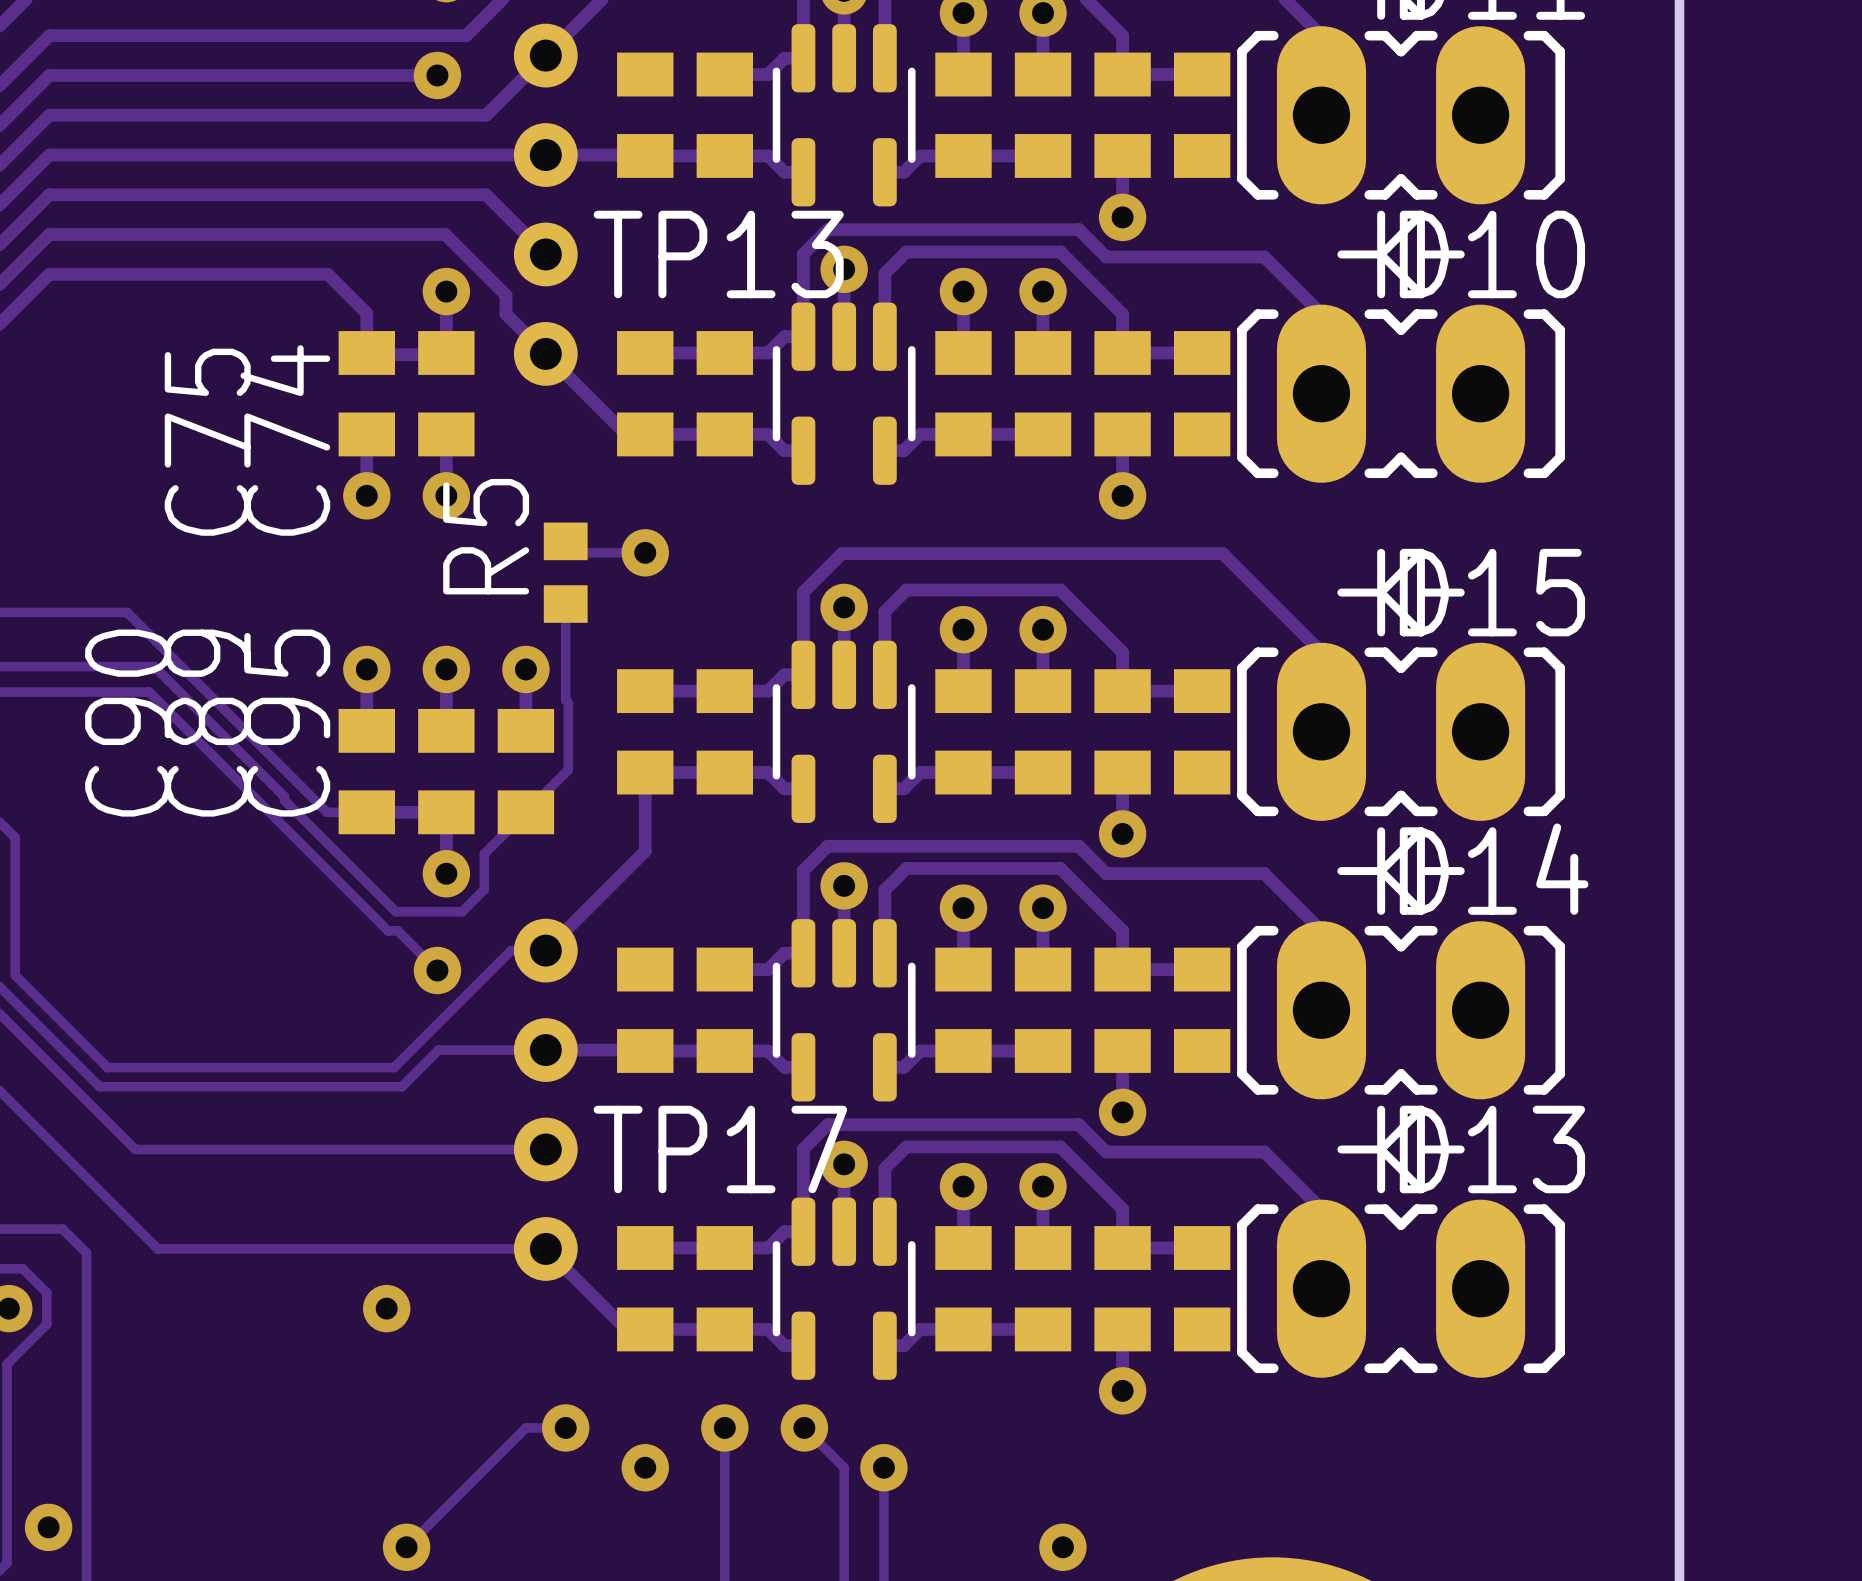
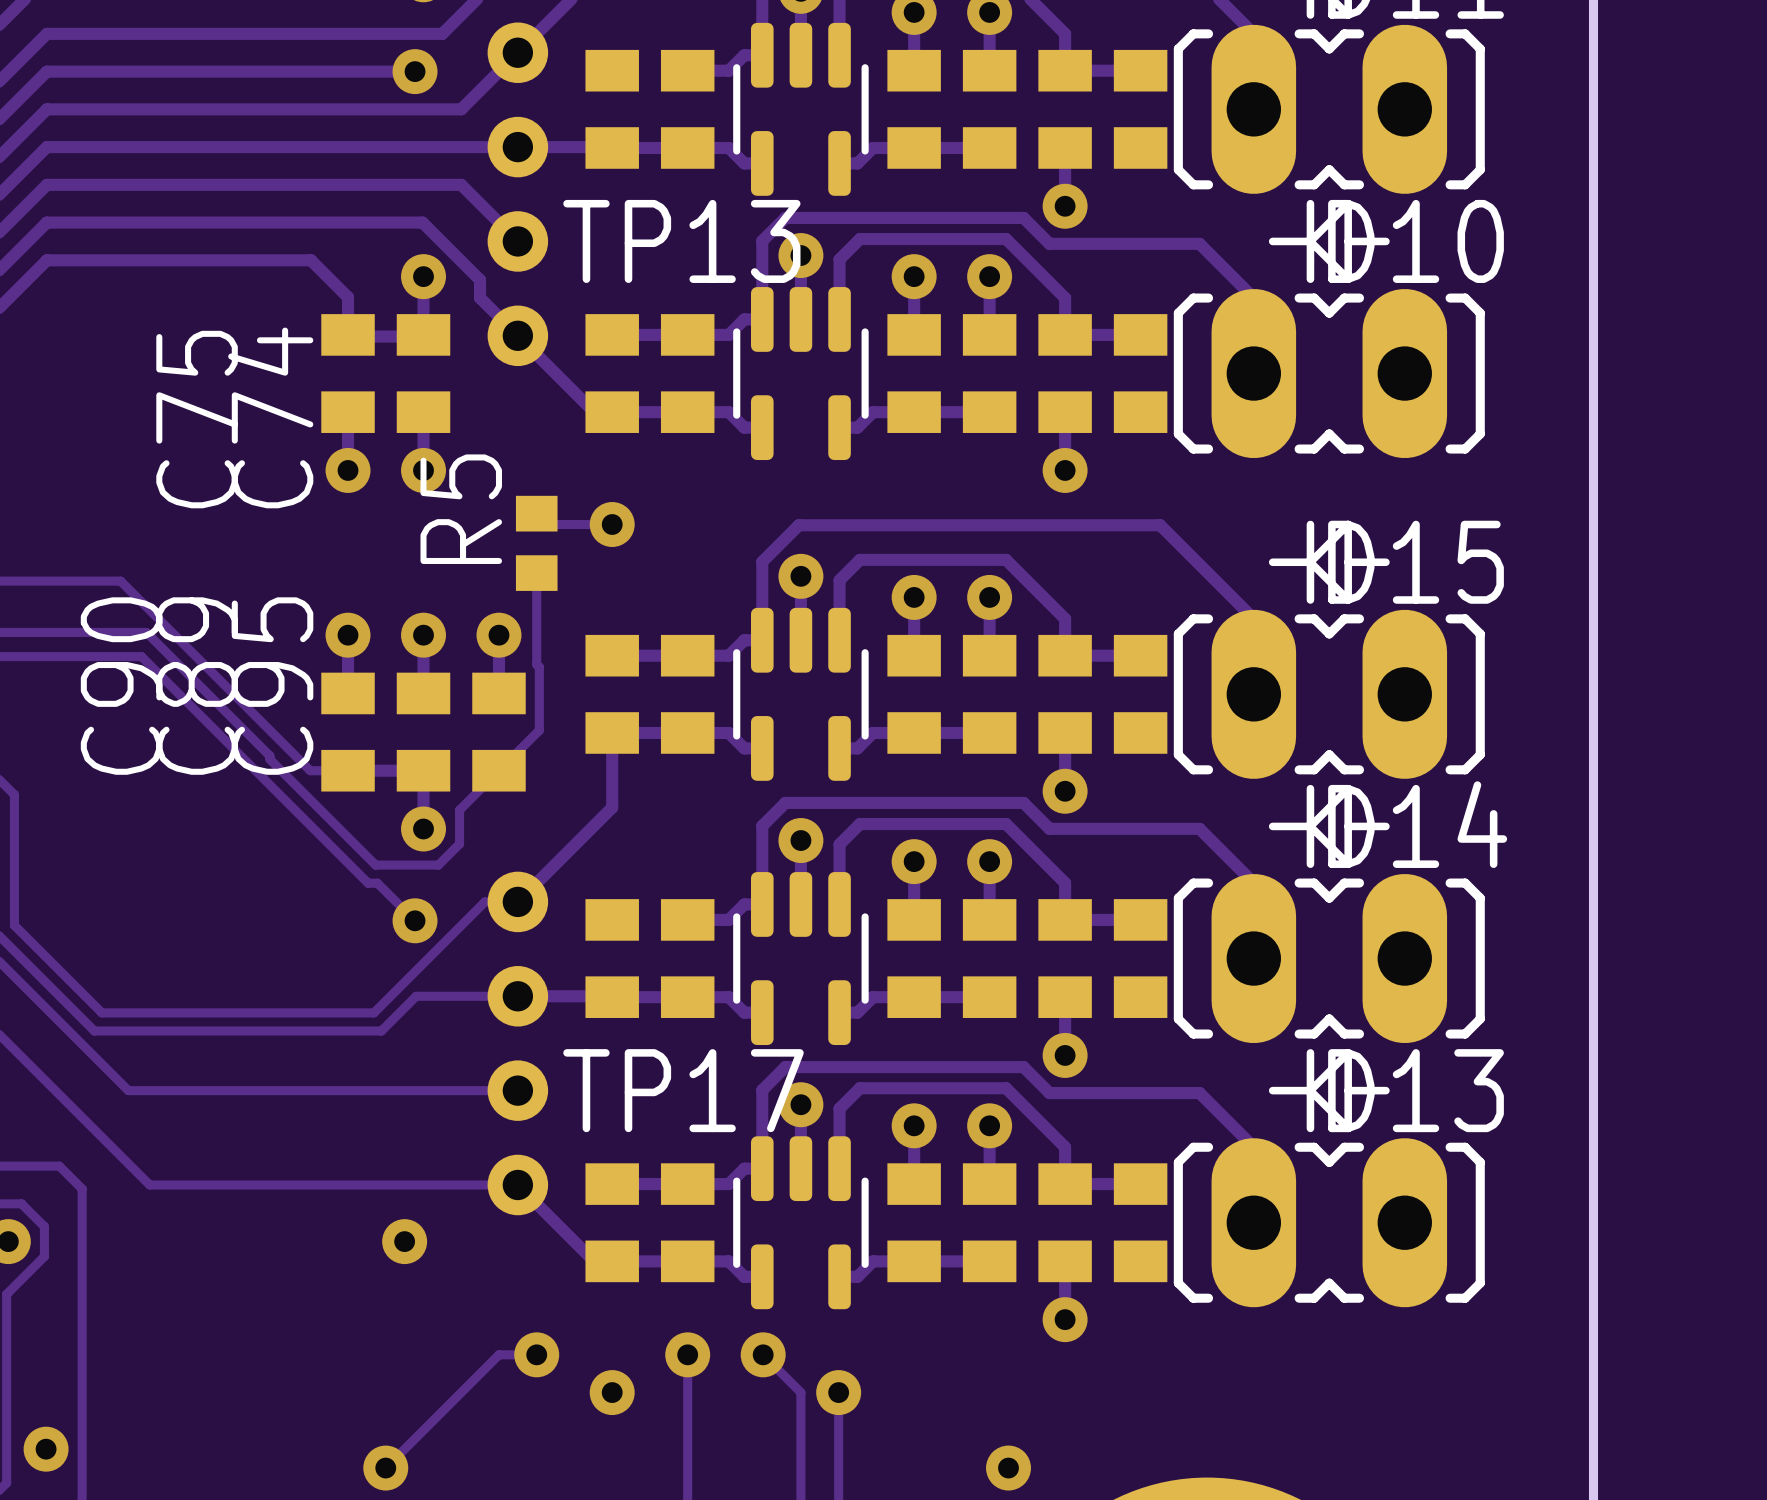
via position: (386, 1308) -> (404, 1241)

